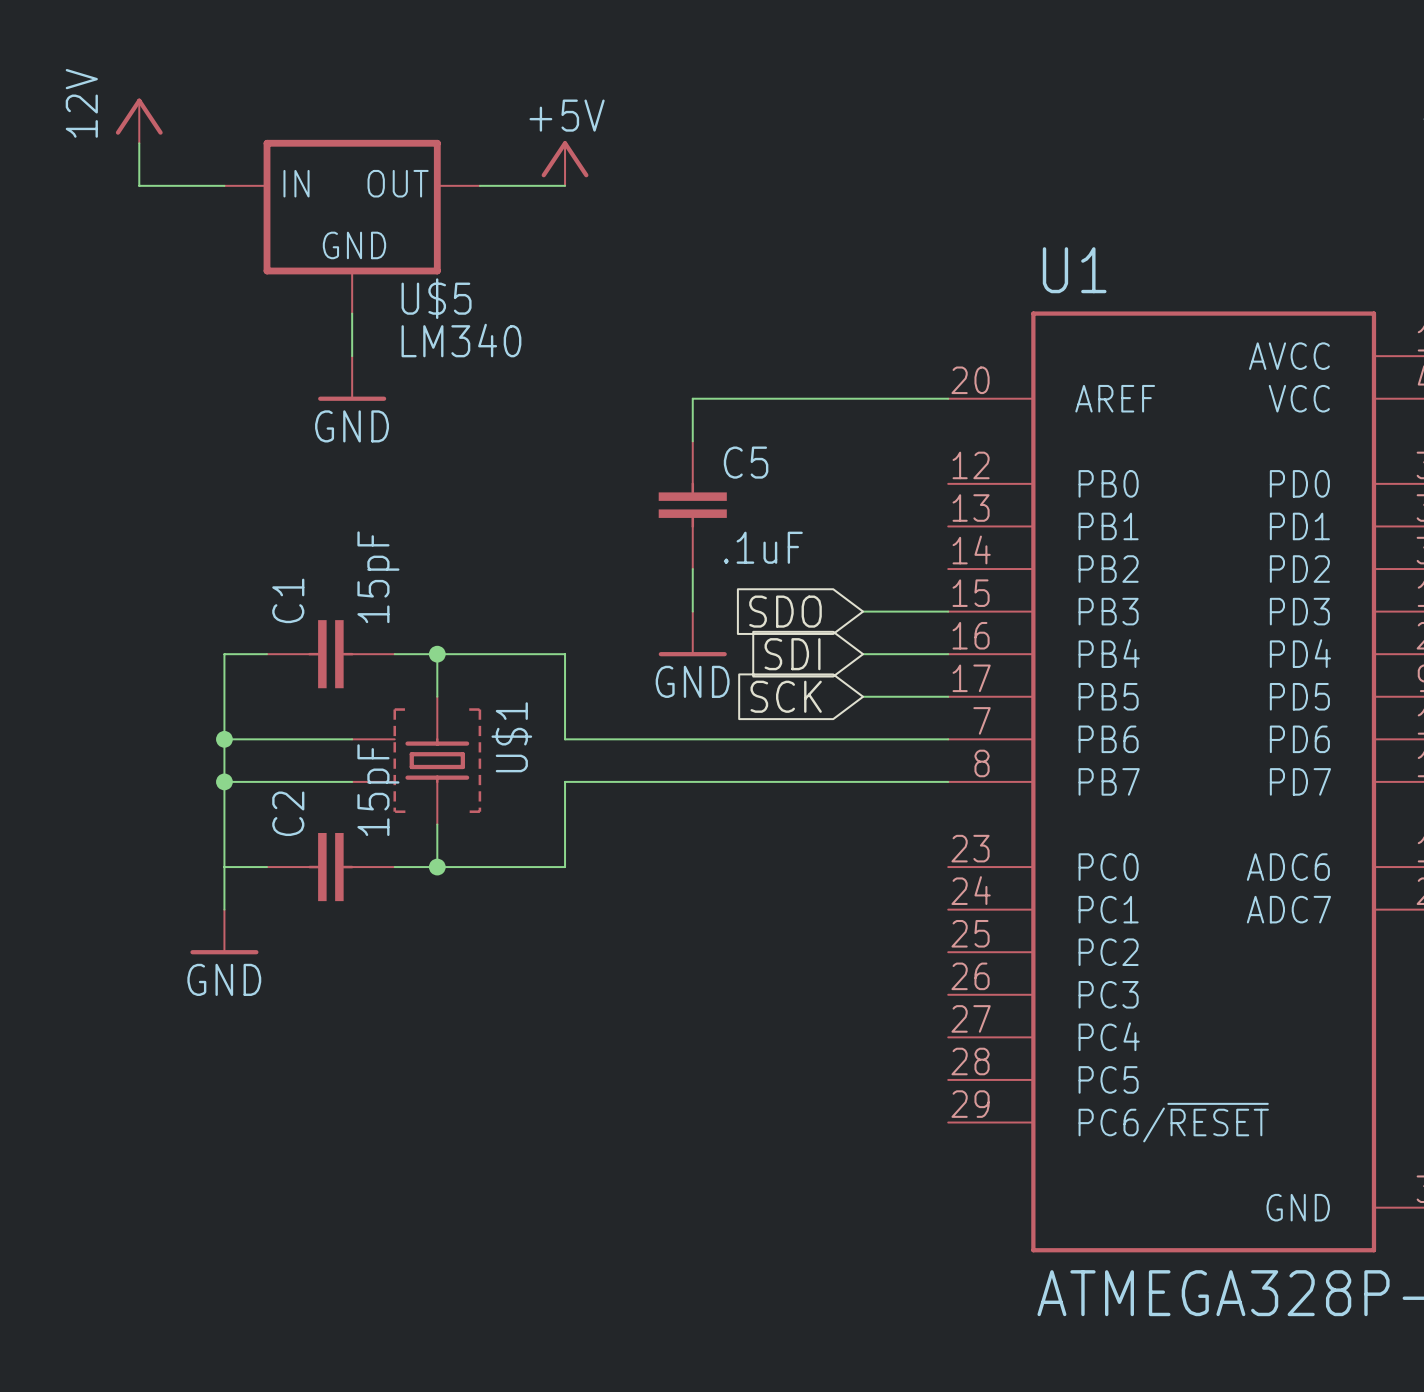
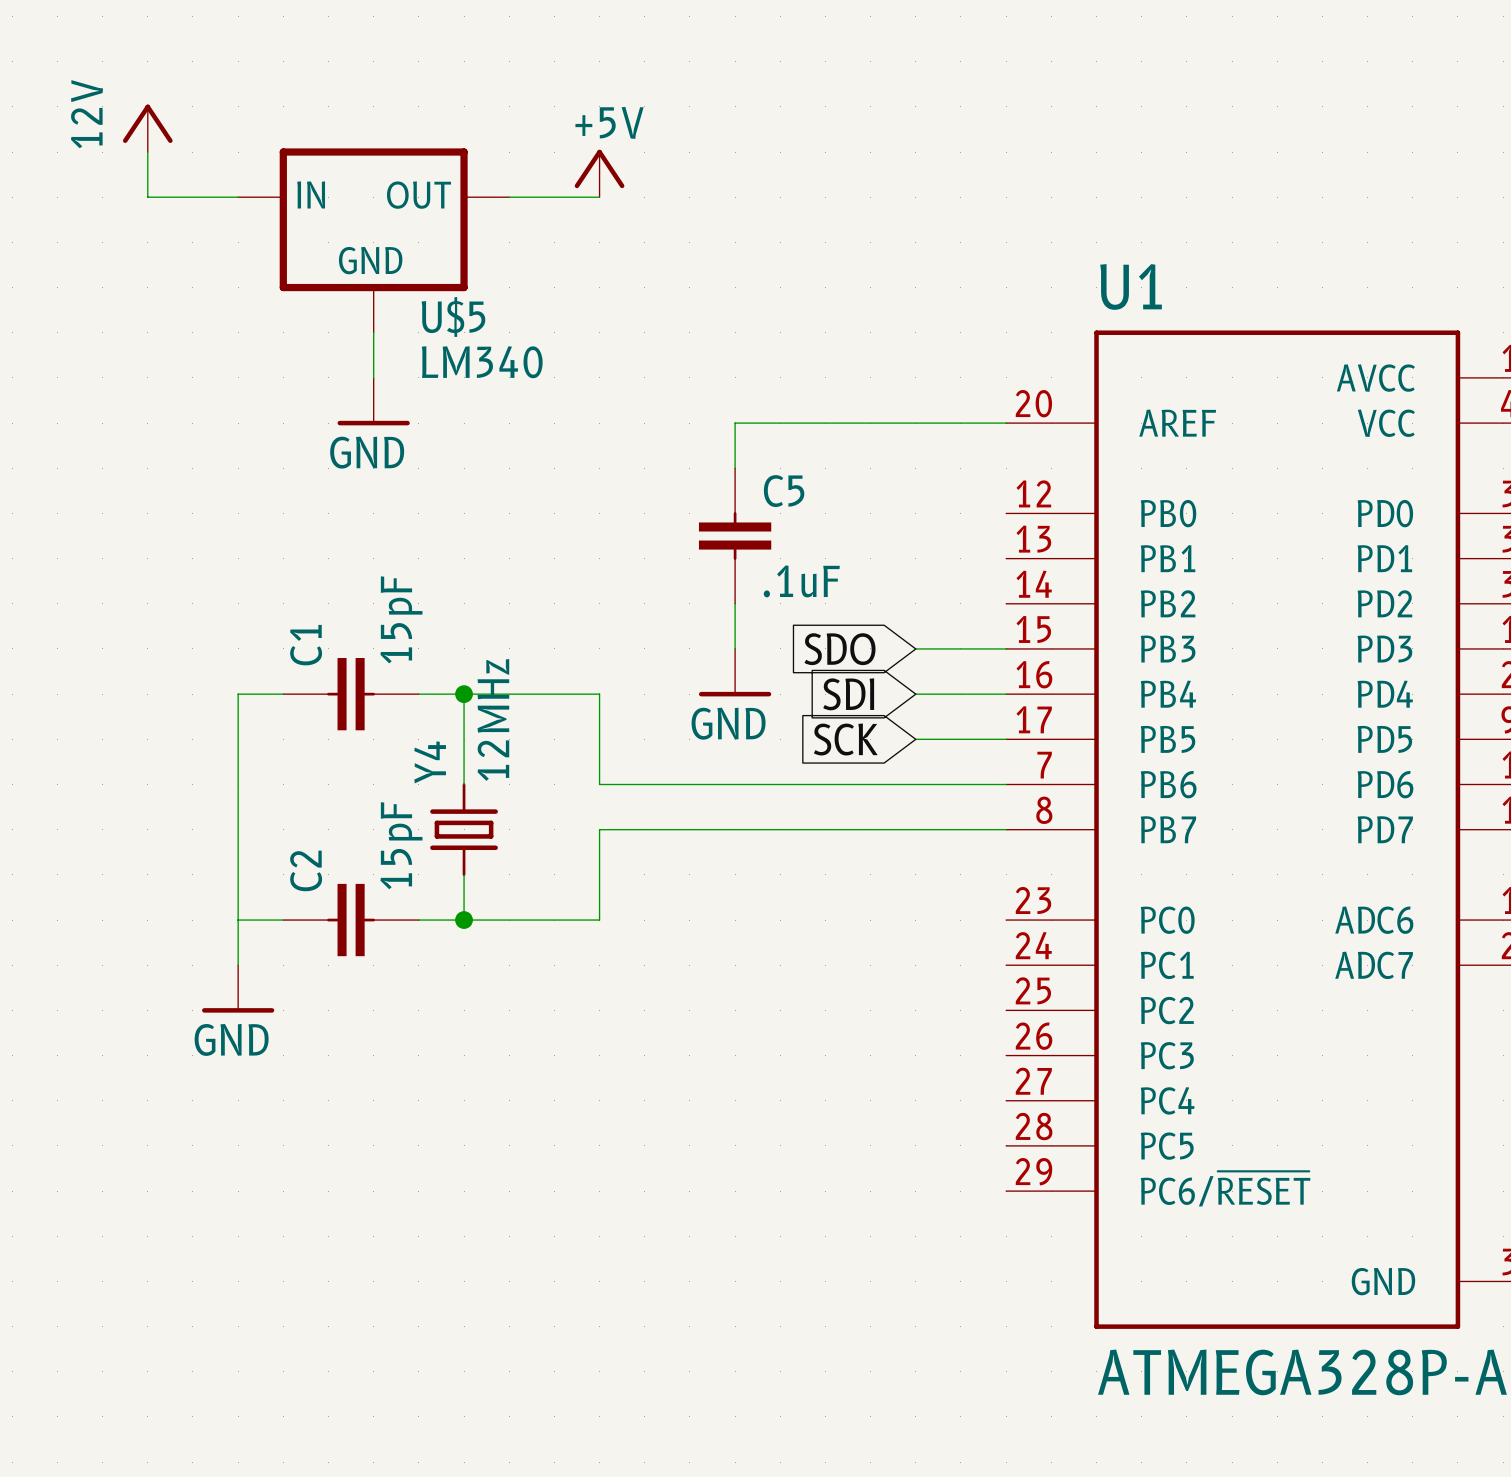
wire: (224, 739) (352, 739) -> none
junction: (224, 739) -> none
U$1: (416, 760) -> none
wire: (224, 781) (352, 781) -> none
junction: (224, 781) -> none
Y4: none -> 12MHz (464, 829)

